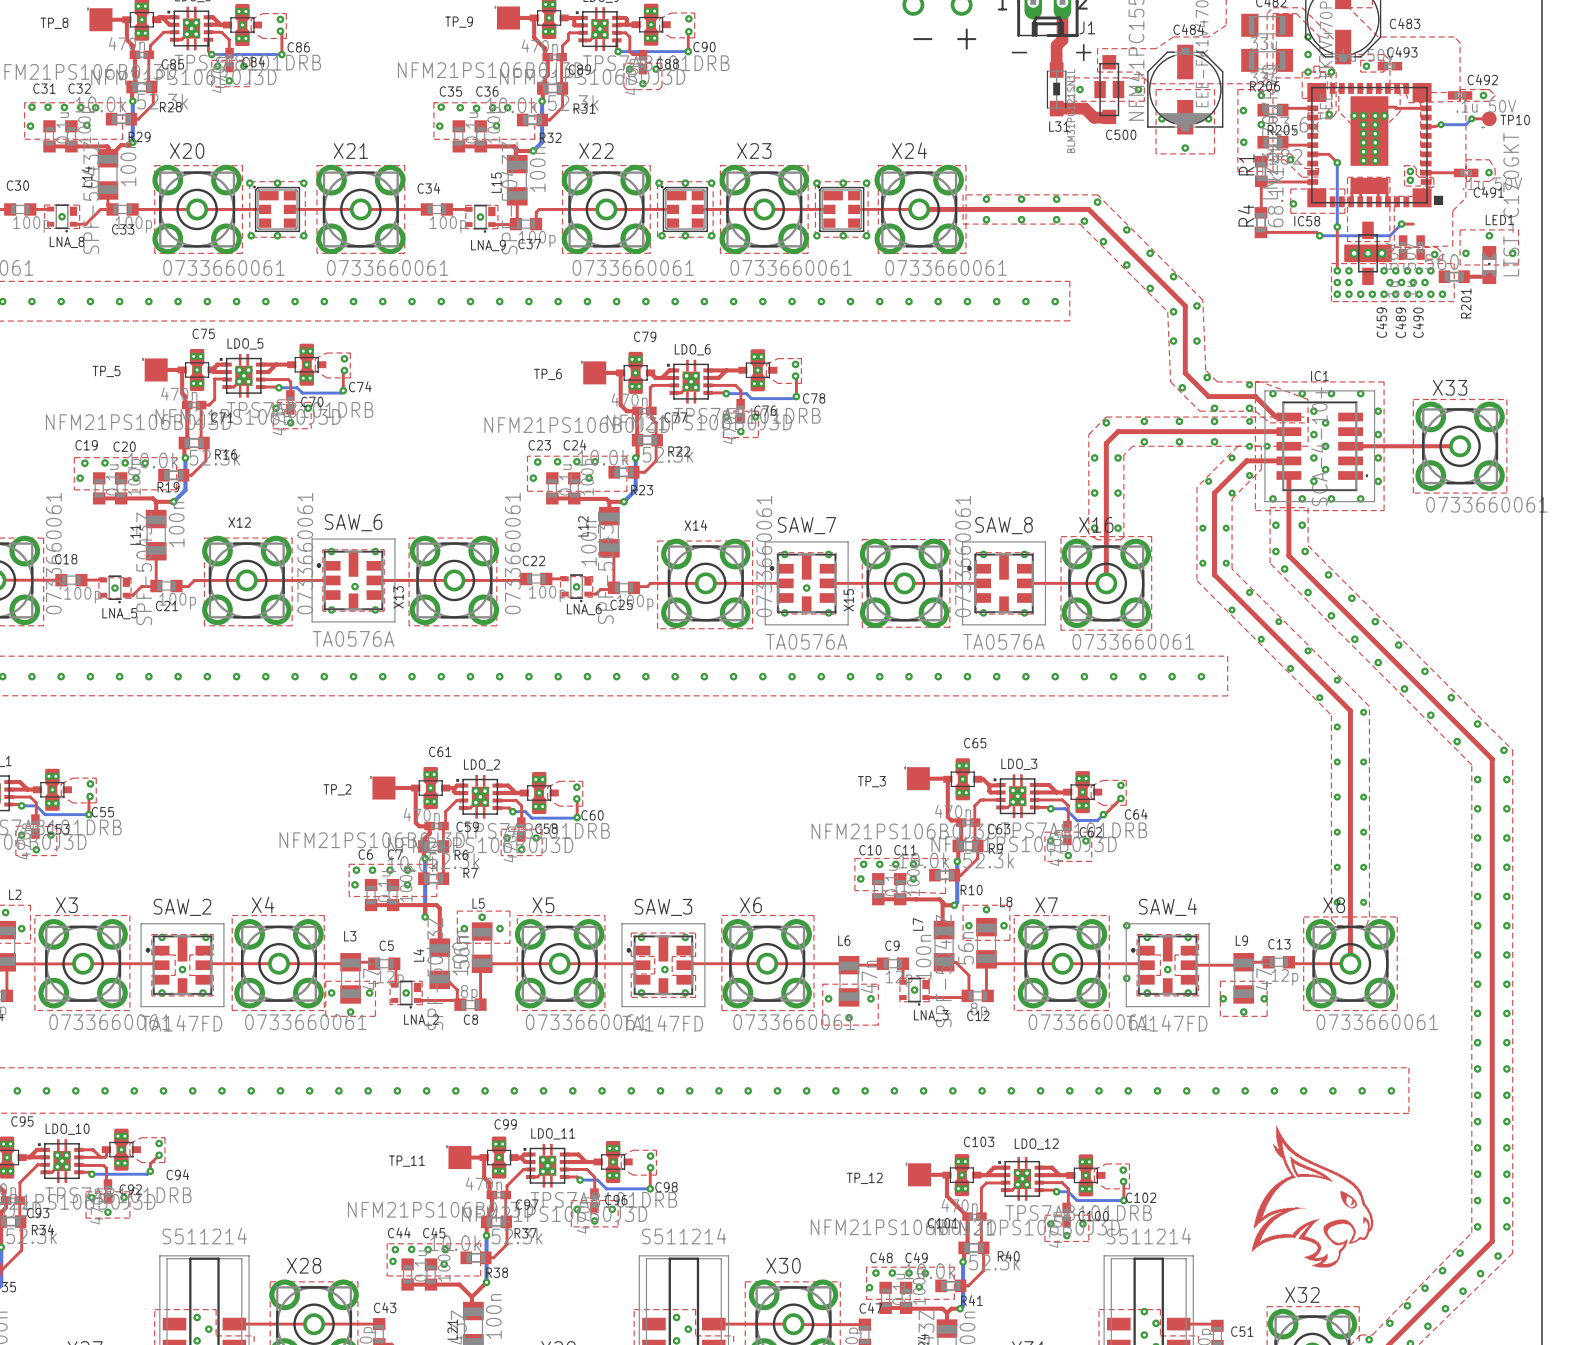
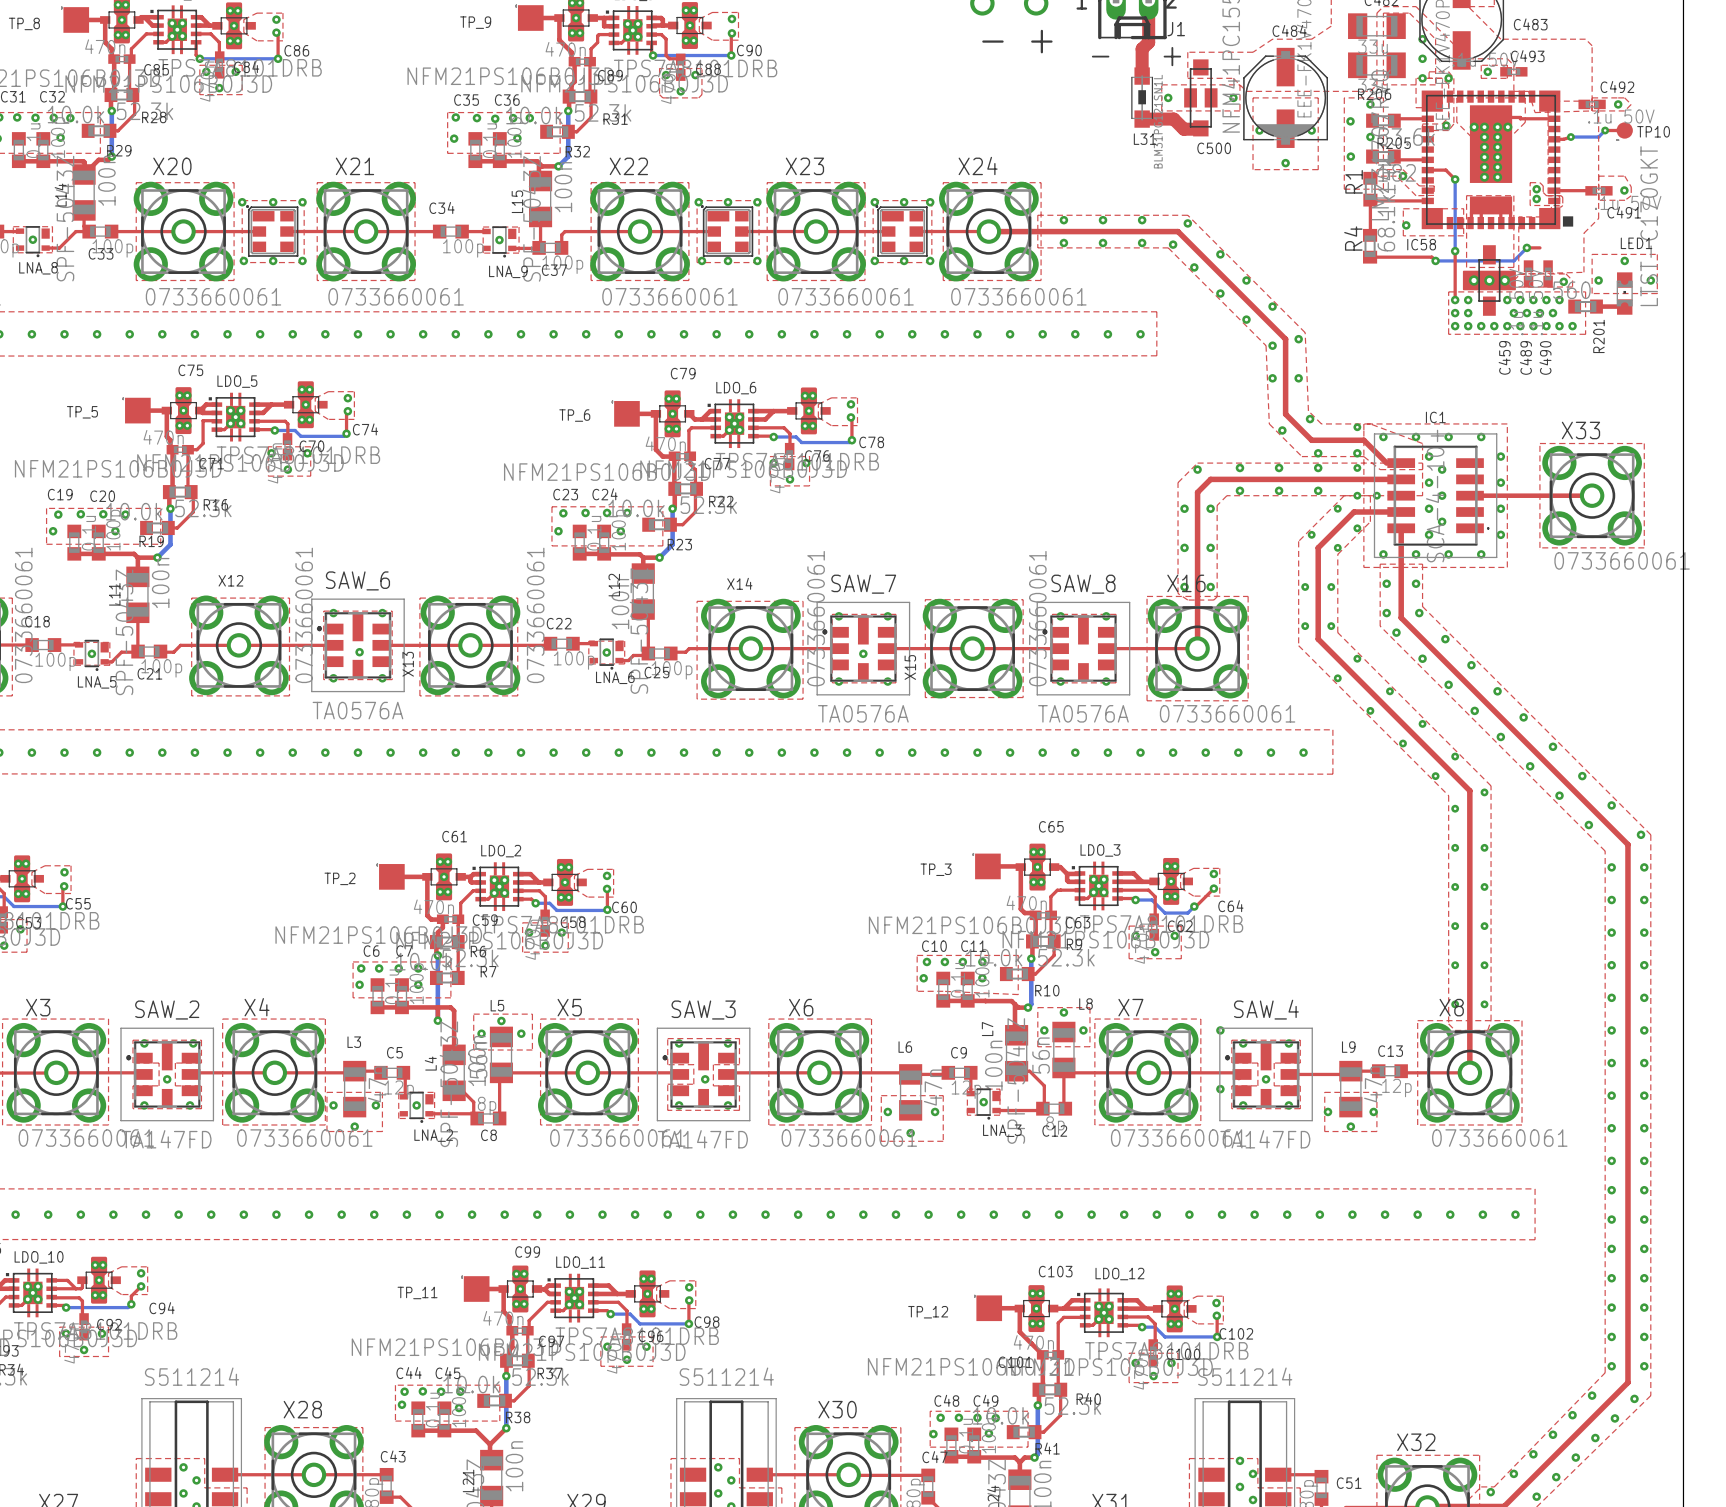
drawing: [1251, 1125, 1374, 1268] -> none

